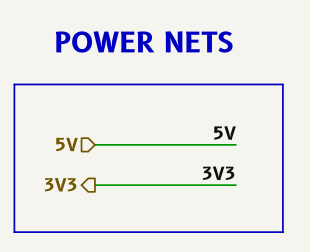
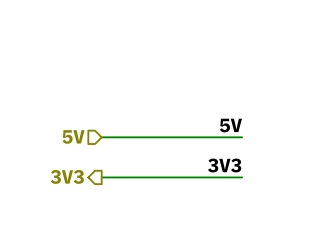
text: POWER NETS (144, 41) -> none
bus: (14, 84) (14, 232) (282, 232) (282, 84) (14, 84) -> none

